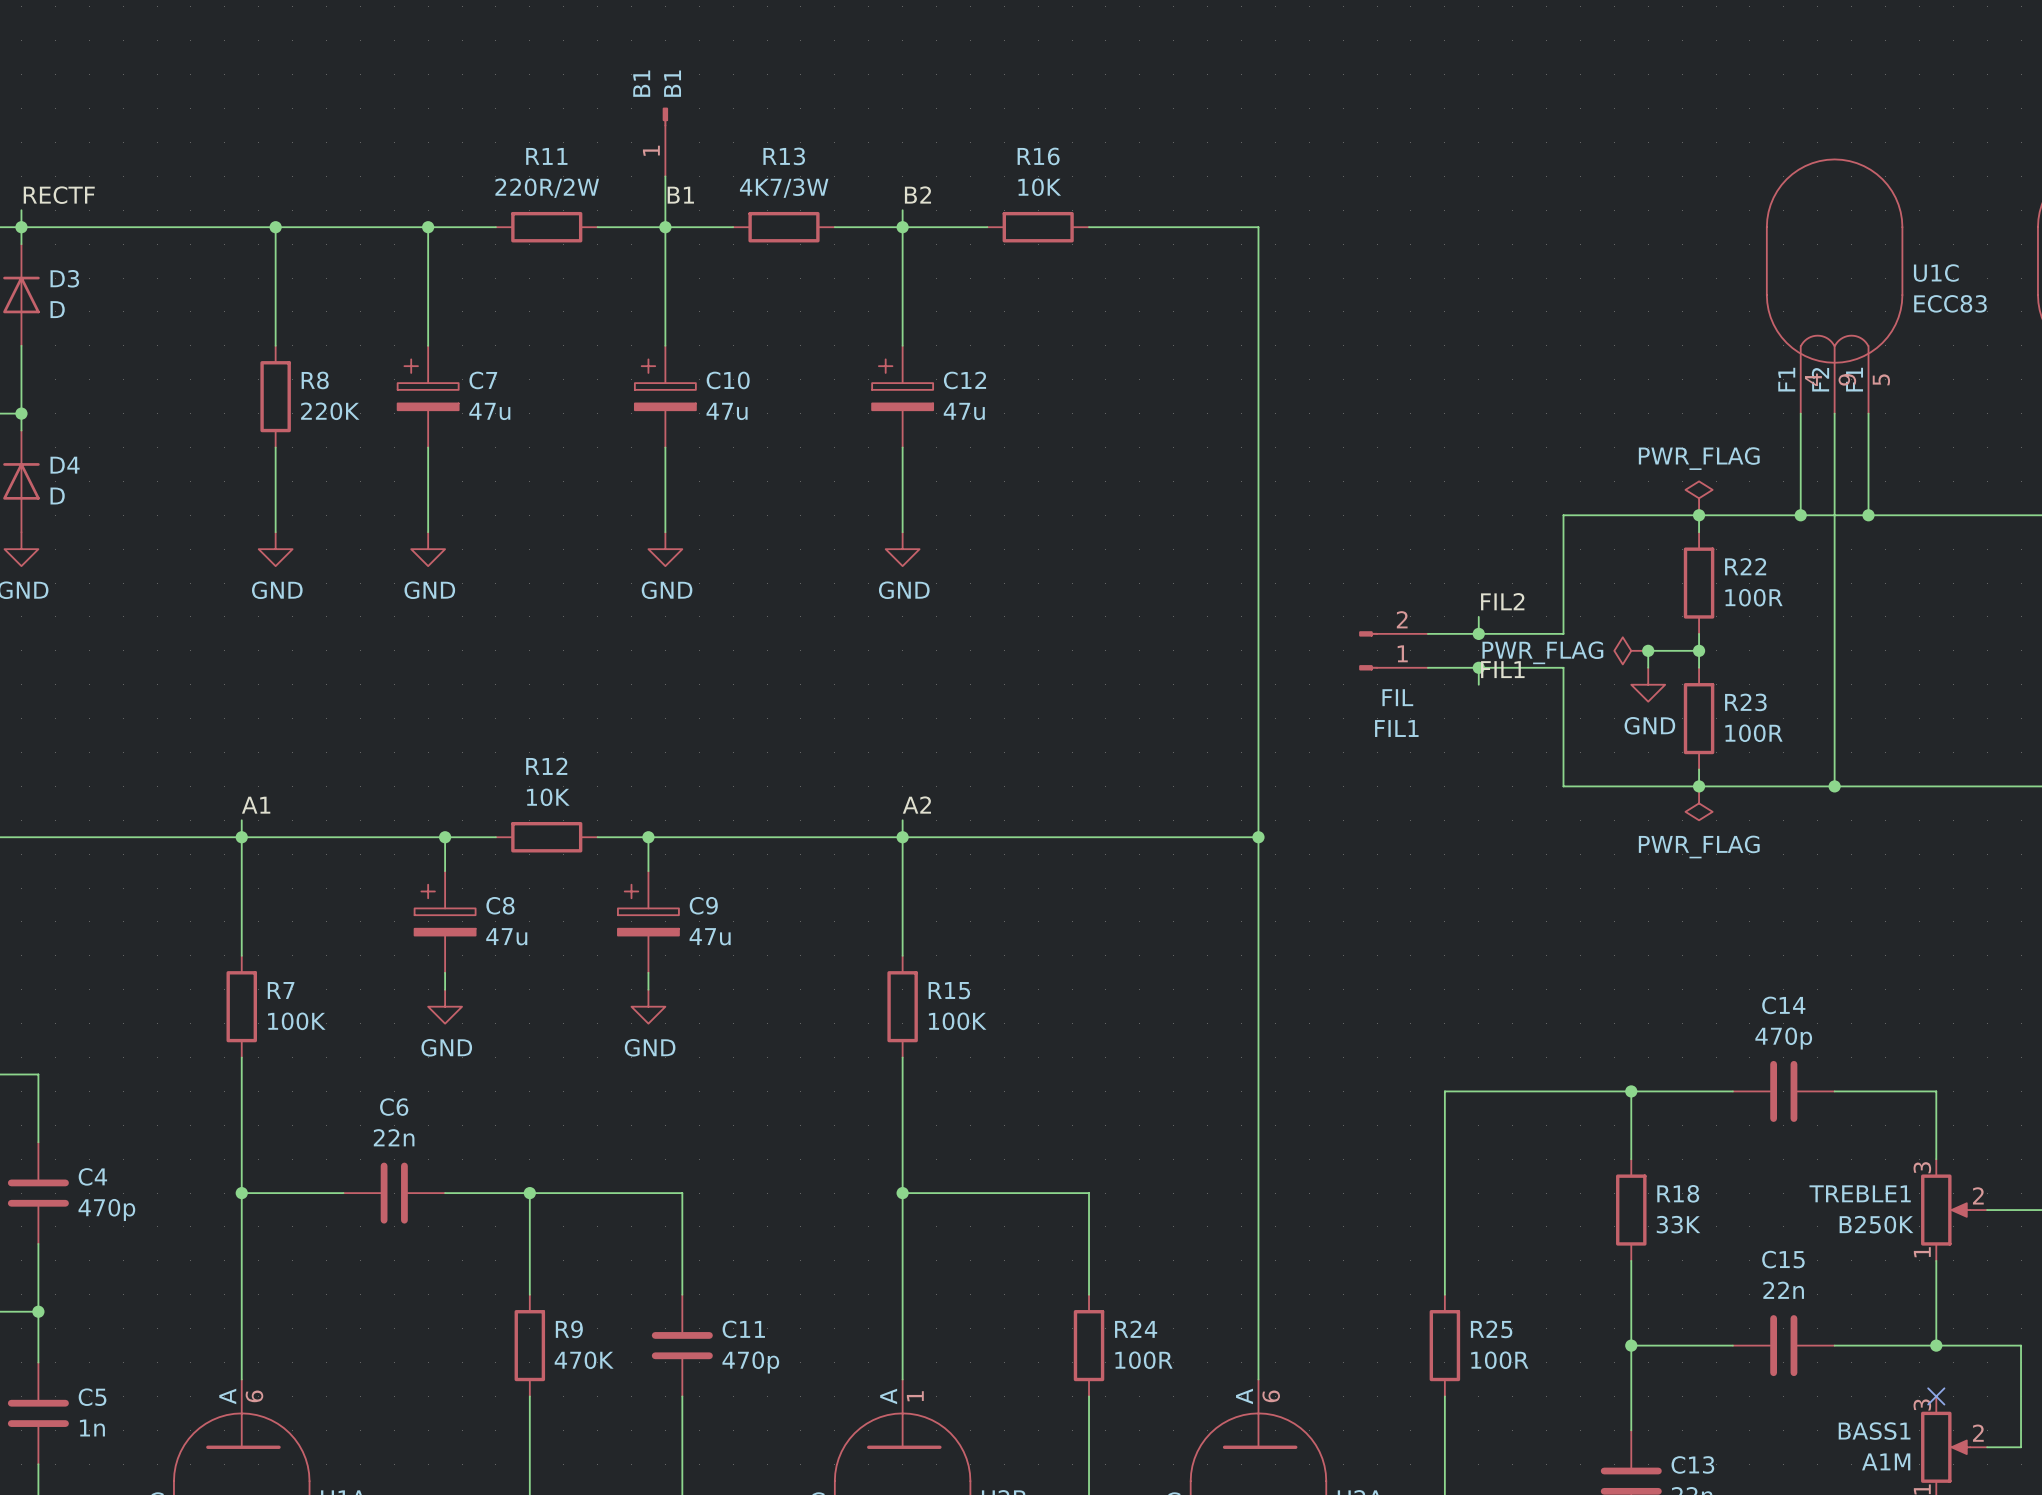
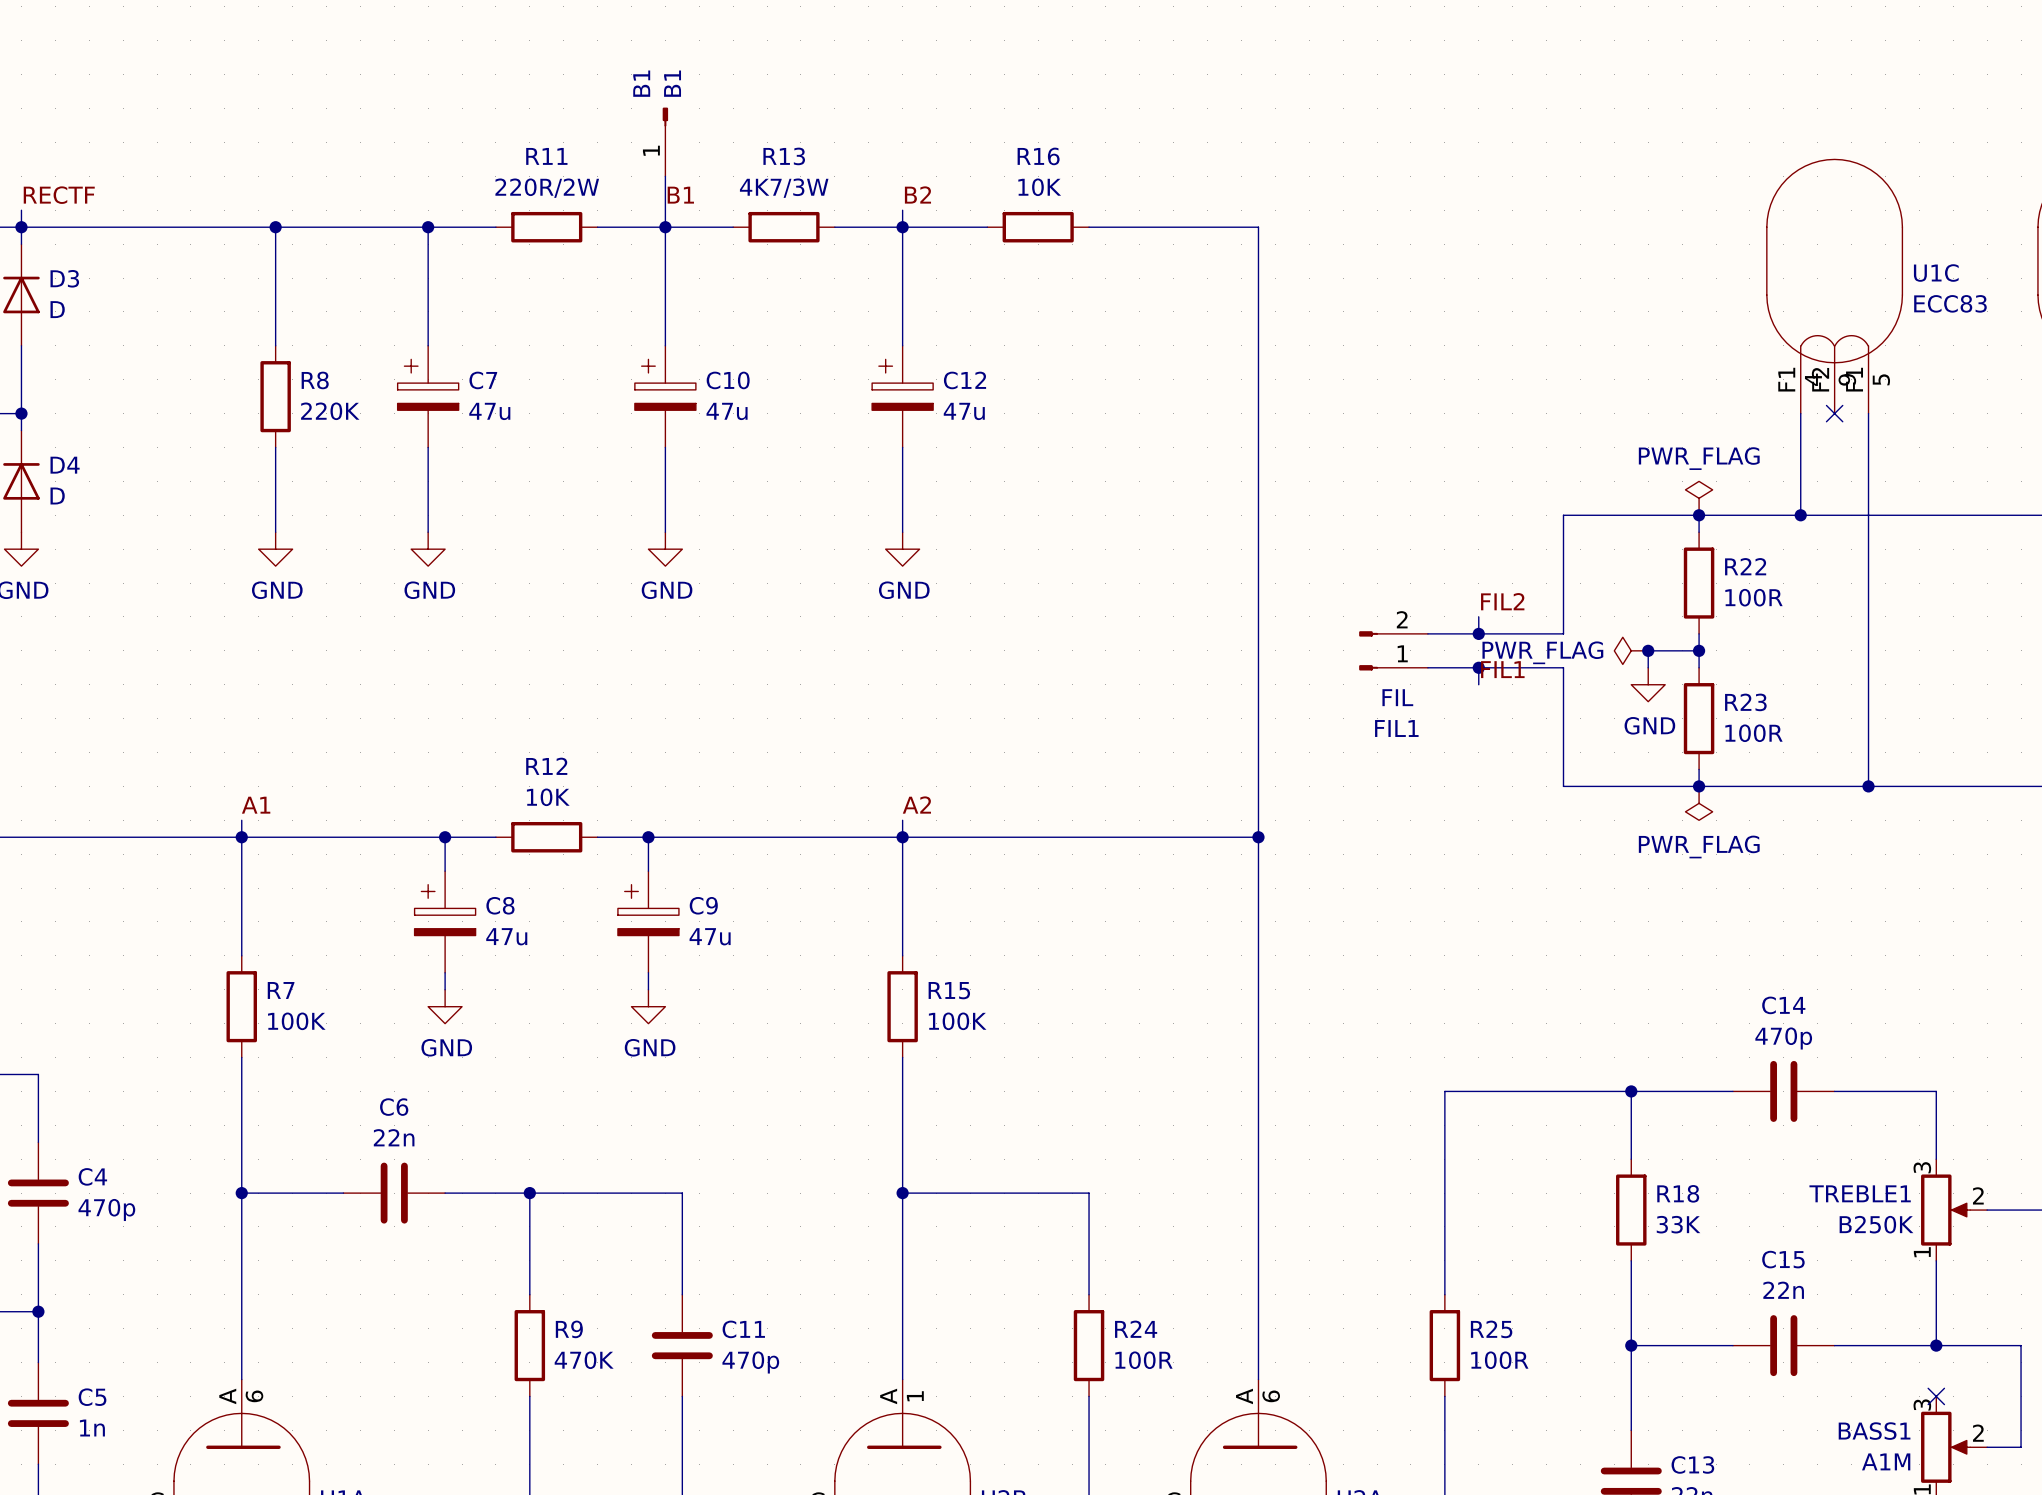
wire: (1834, 413) (1834, 786) -> none
no-connect mark: none -> (1834, 413)
wire: none -> (1868, 515) (1868, 786)
junction: (1868, 515) -> none
junction position: (1834, 786) -> (1868, 786)

